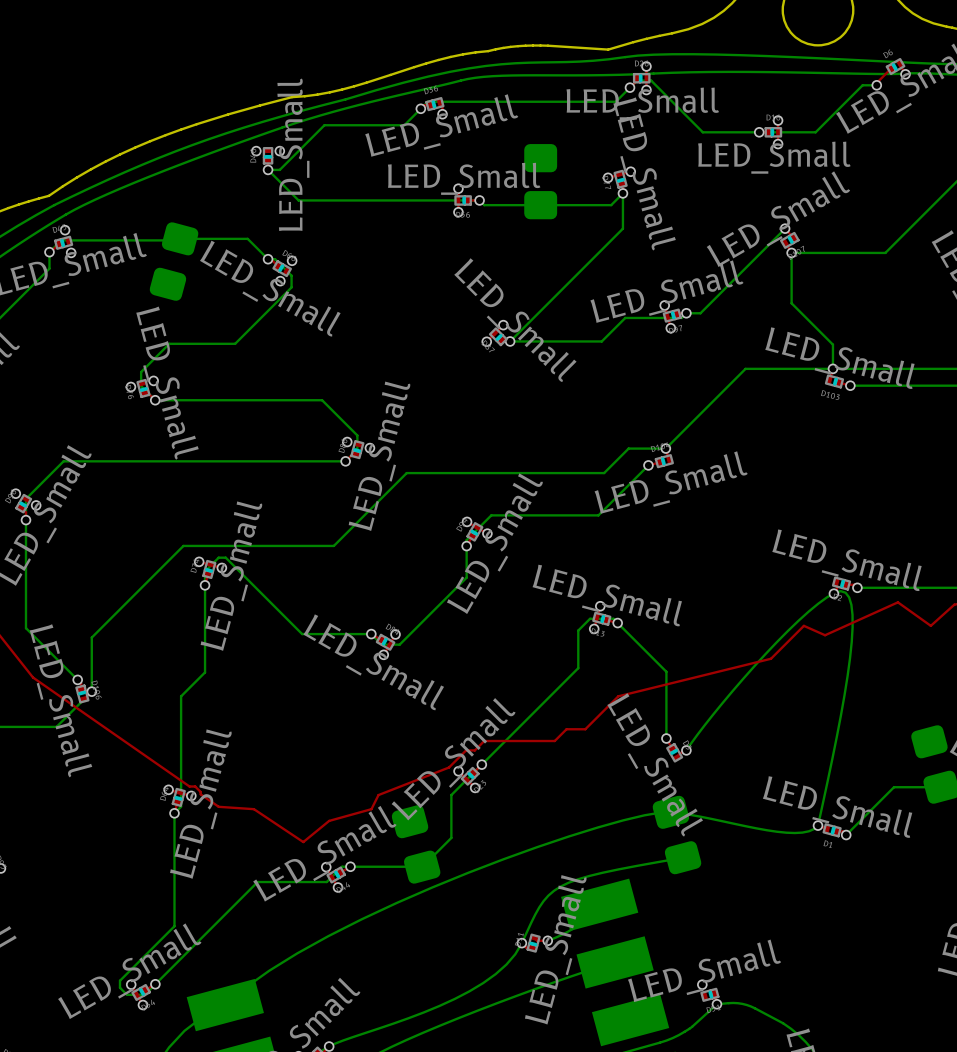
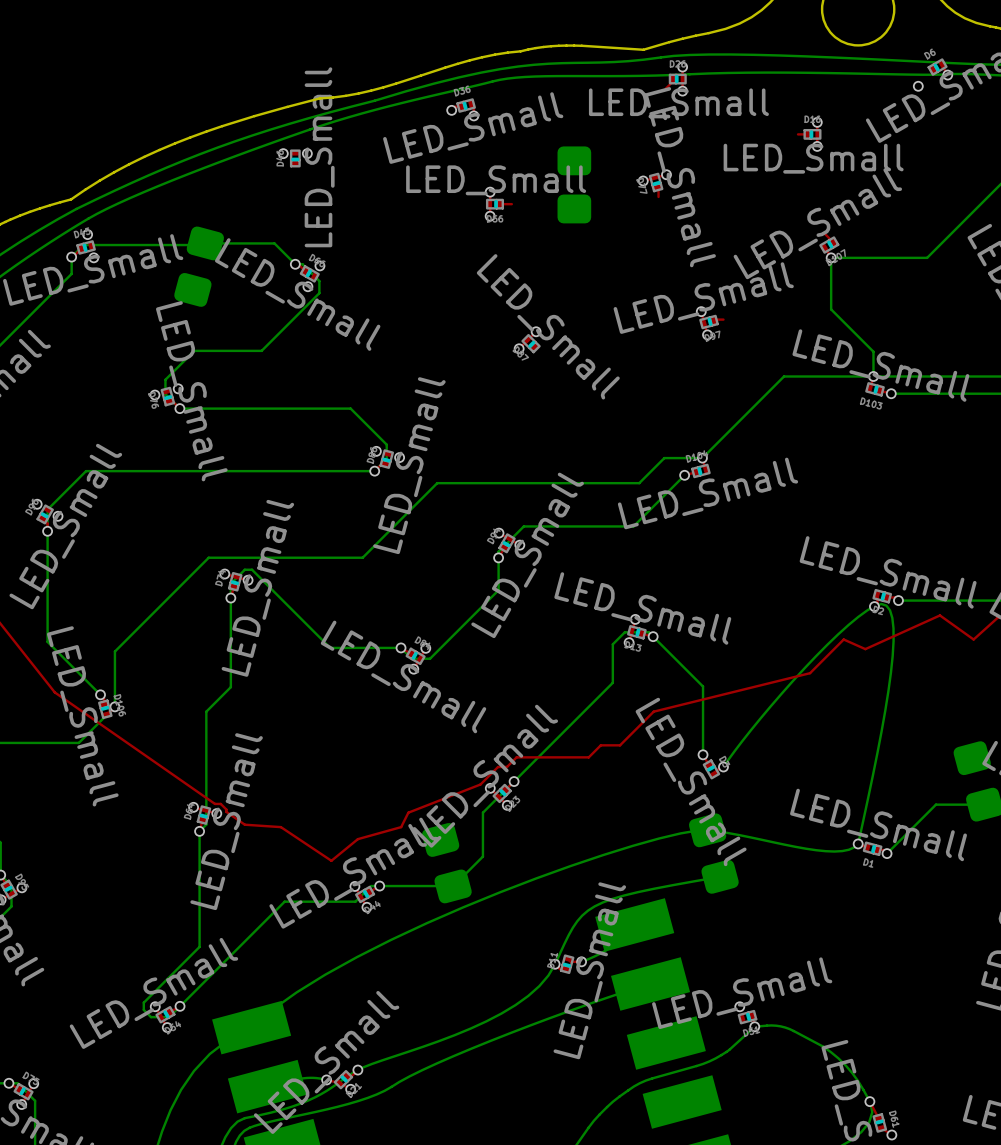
top track: (891, 68) (876, 82) (876, 85) -> none
bottom track: (876, 85) (862, 85) (815, 132) (702, 132) (651, 80) (637, 80) (615, 101) (427, 101) (404, 125) (324, 125) (279, 169) (268, 169) (298, 200) (479, 200) (484, 205) (611, 205) (622, 193) (622, 228) (510, 341) (601, 341) (625, 317) (681, 317) (686, 313) (700, 313) (785, 228) -> none
via: (629, 87) -> none
via: (759, 132) -> none
via: (268, 169) -> none
via: (622, 193) -> none
via: (479, 200) -> none
via: (785, 228) -> none
via: (686, 313) -> none
via: (510, 341) -> none

